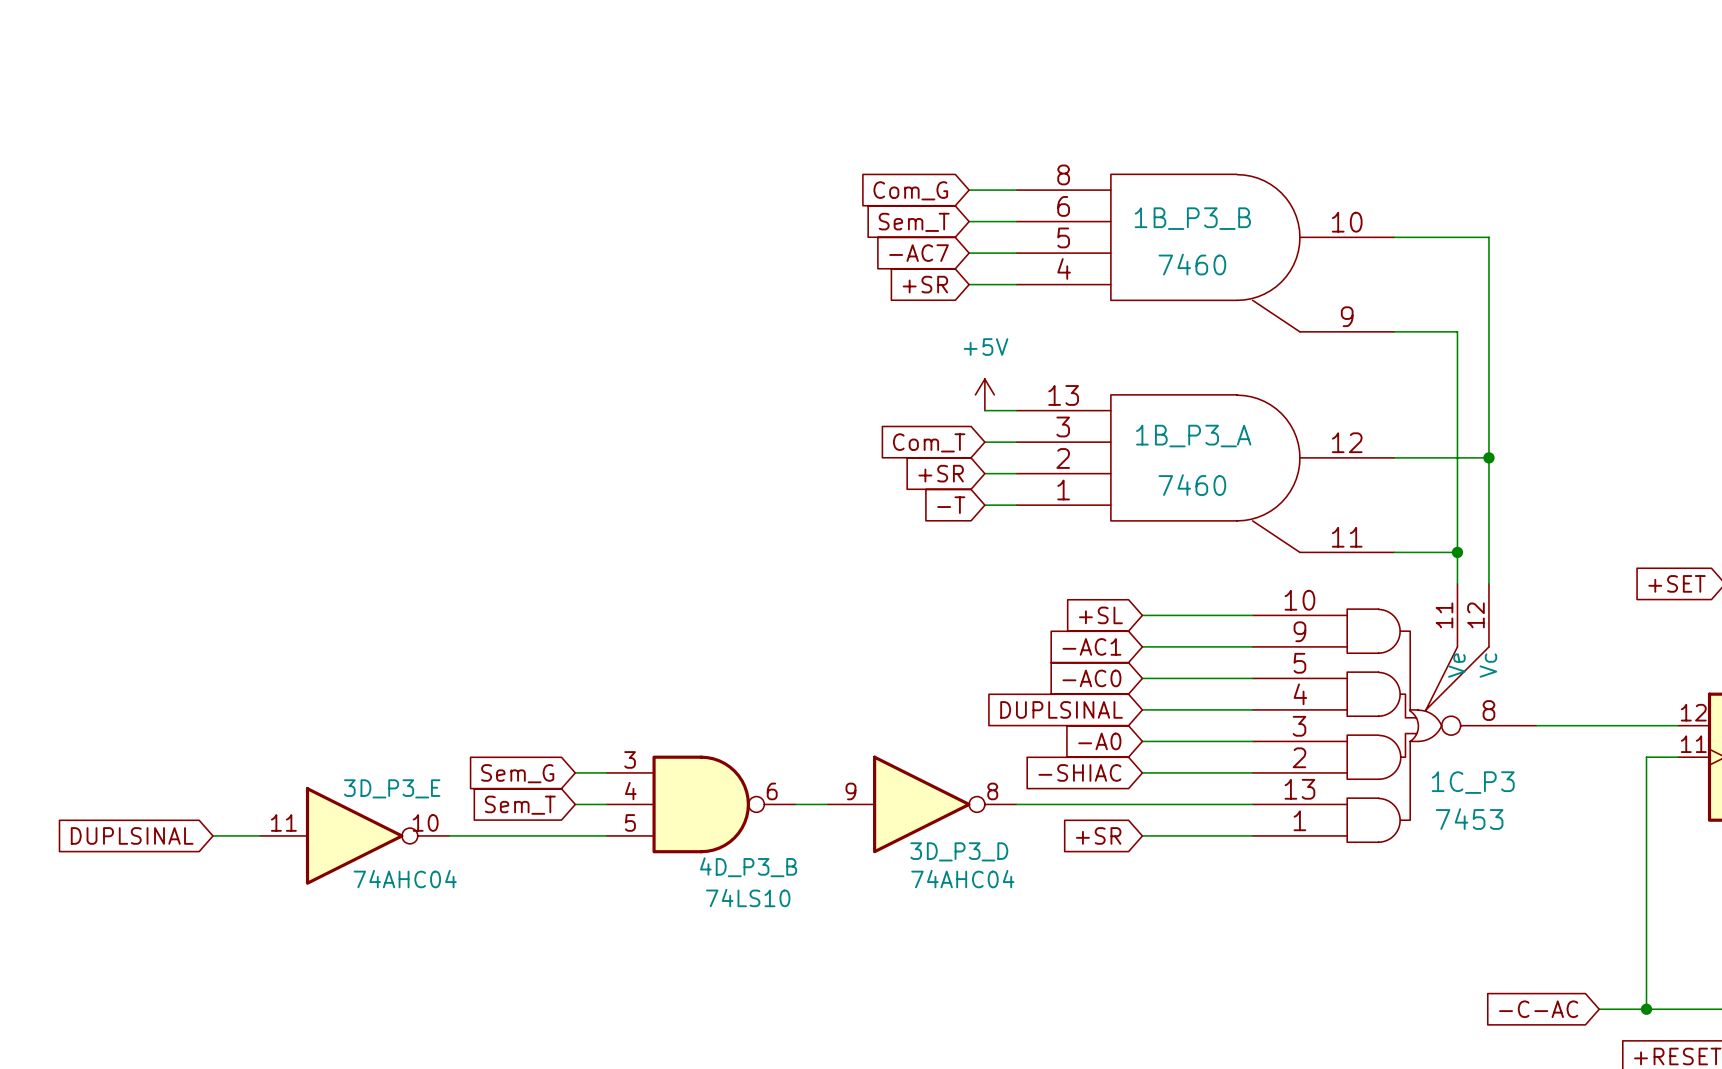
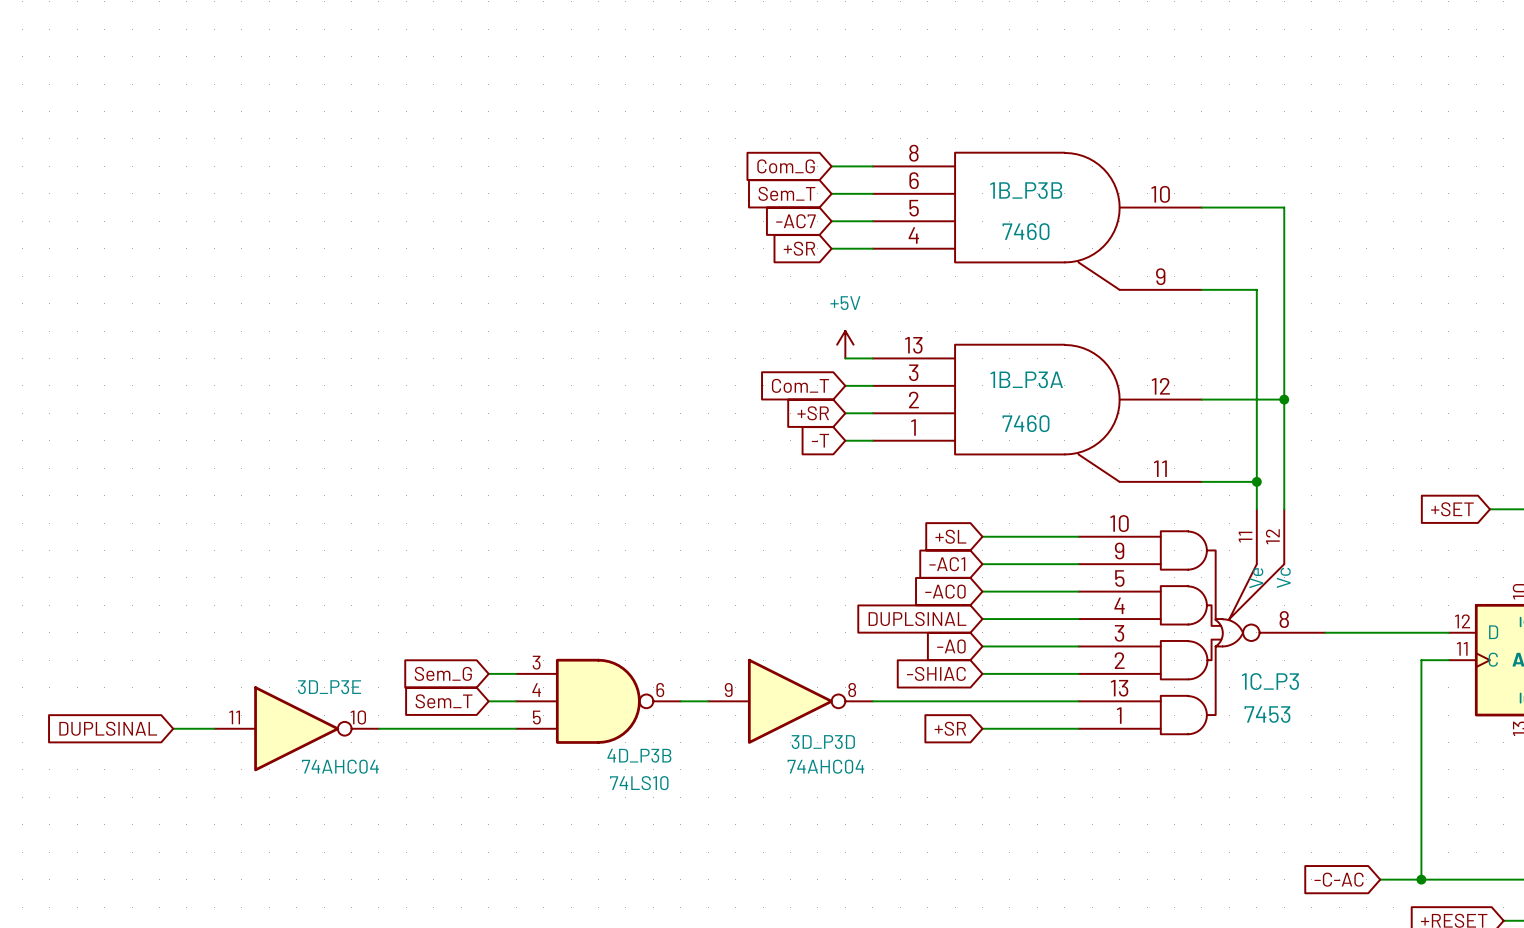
1B_P3_B name: 1B_P3_B (1192, 218) -> 1B_P3B (1026, 190)
1B_P3_A name: 1B_P3_A (1193, 436) -> 1B_P3A (1026, 379)
3D_P3_E name: 3D_P3_E (392, 788) -> 3D_P3E (329, 687)
3D_P3_D name: 3D_P3_D (959, 851) -> 3D_P3D (823, 742)
4D_P3_B name: 4D_P3_B (748, 867) -> 4D_P3B (639, 755)

